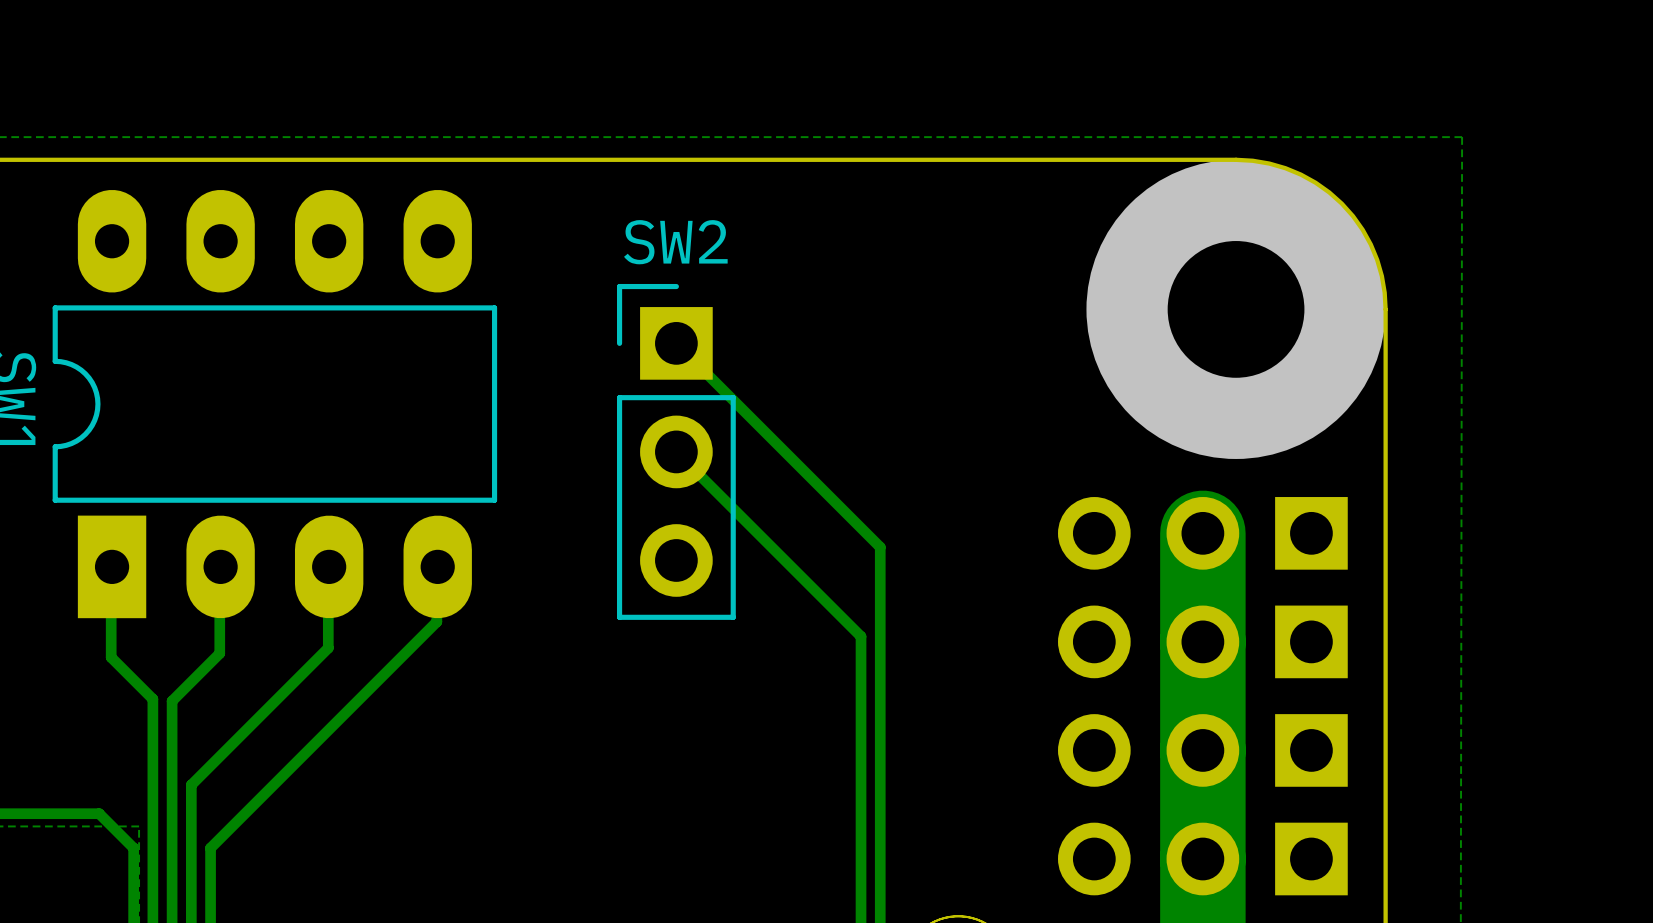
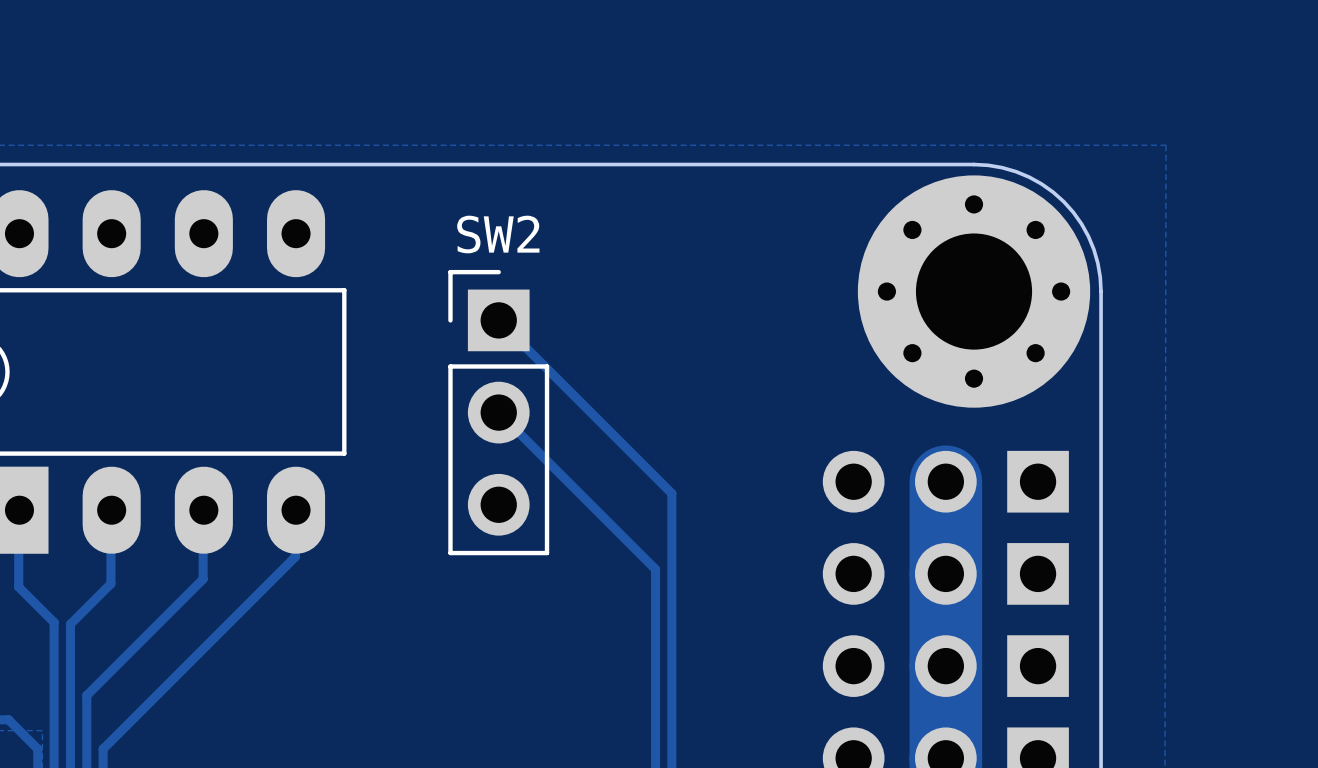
via: (1236, 309) -> none
part: none -> (974, 291)

